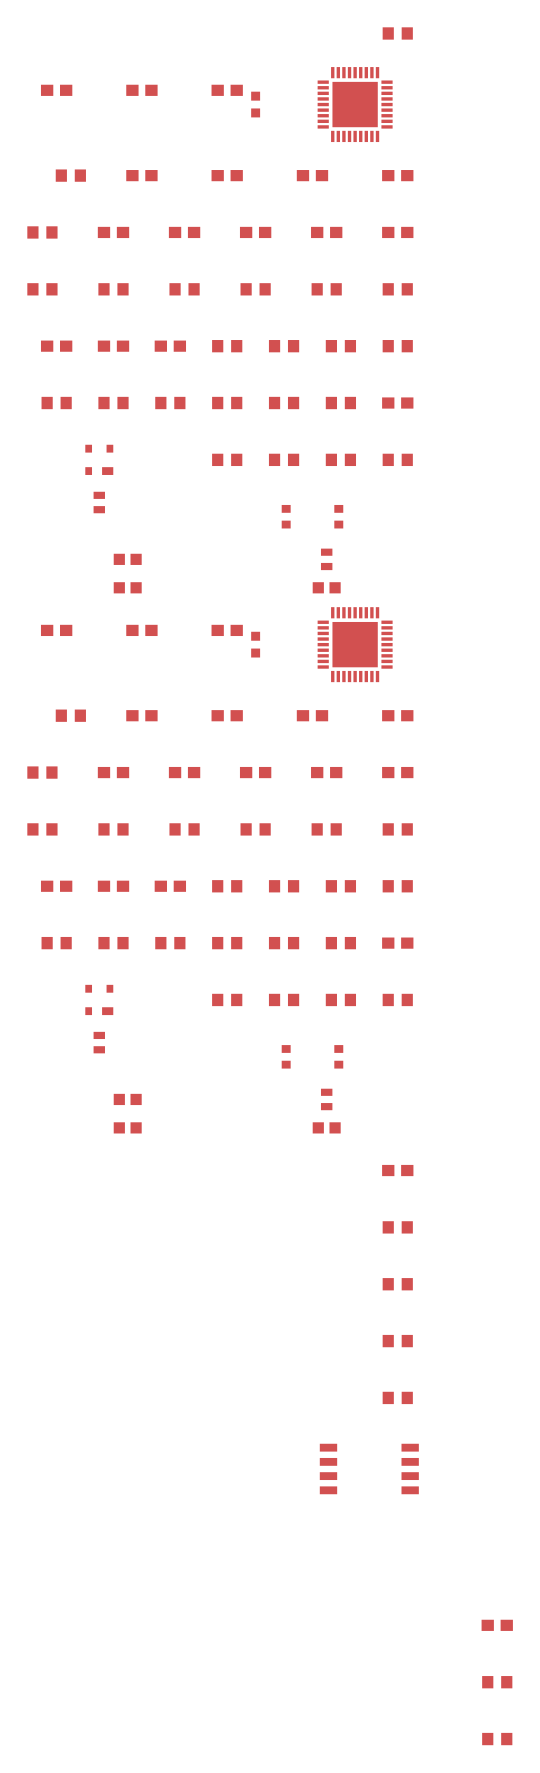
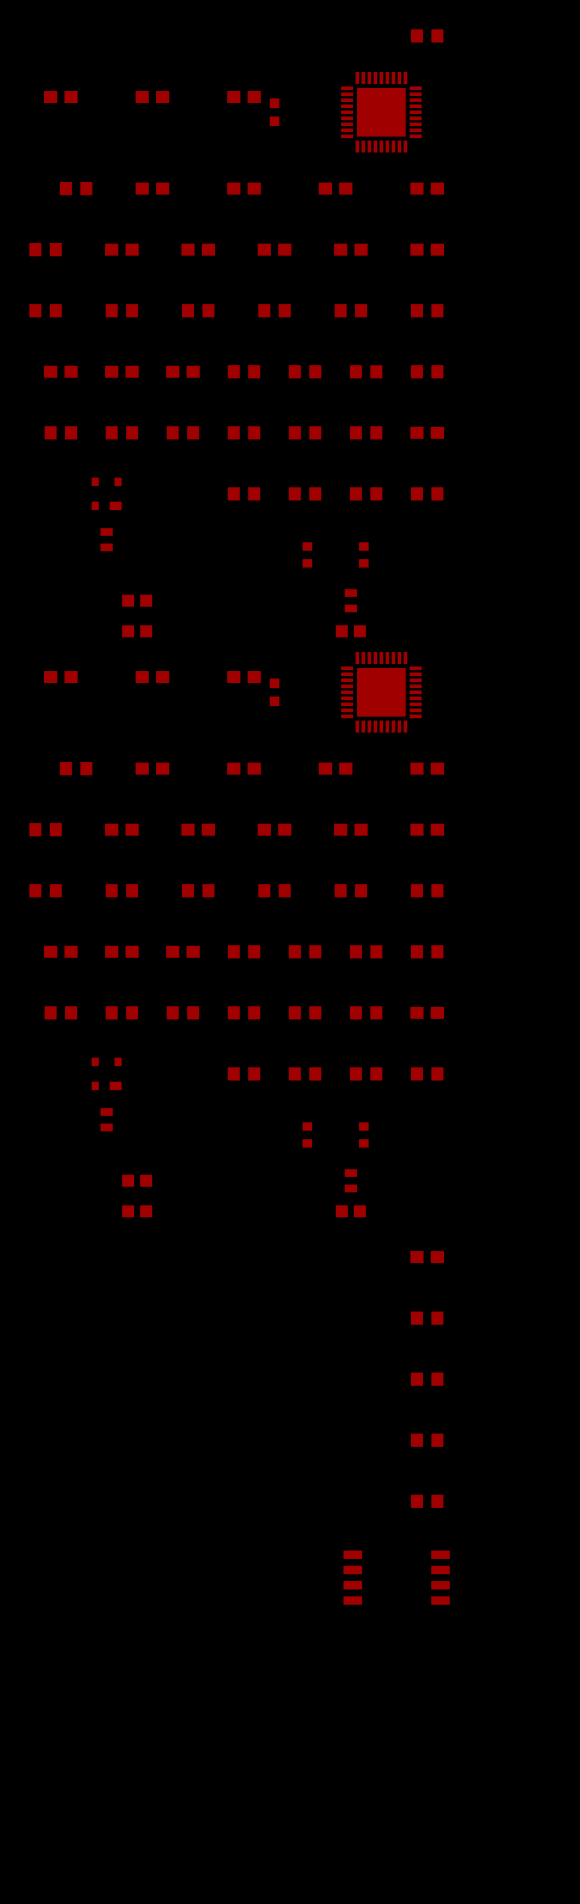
part: (497, 1625) -> none
part: (497, 1682) -> none
part: (497, 1739) -> none

